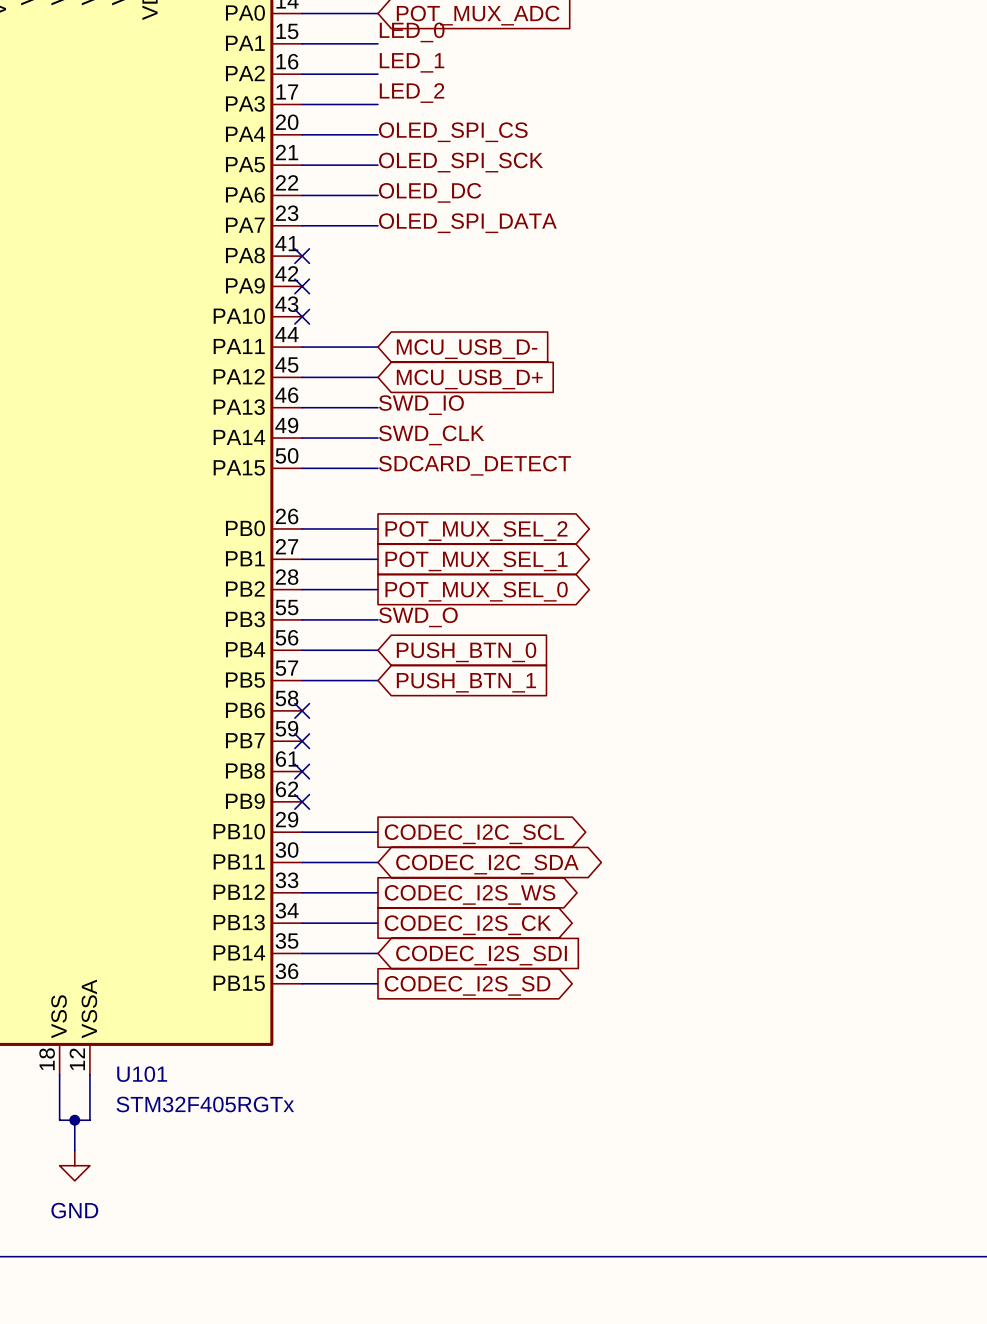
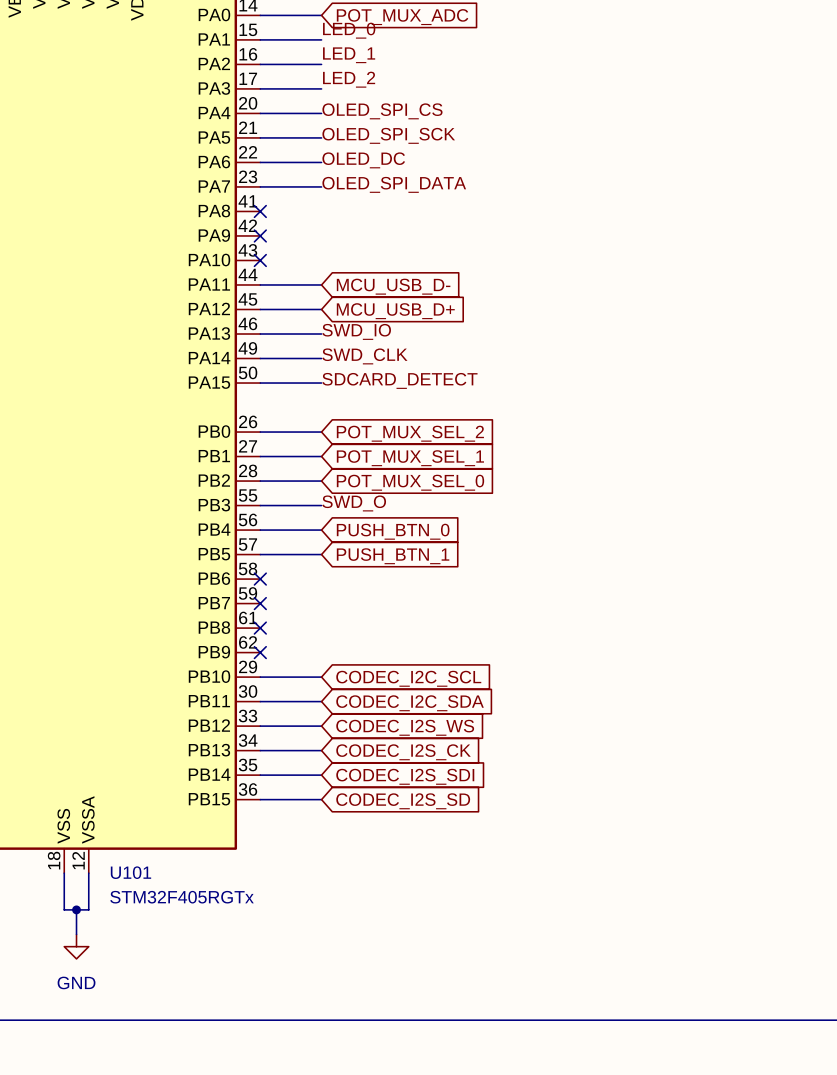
global label shape: output (476, 531) -> input (410, 433)
global label shape: output (476, 561) -> input (410, 458)
global label shape: output (476, 591) -> input (410, 482)
global label shape: output (474, 834) -> input (408, 678)
global label shape: bidirectional (487, 864) -> input (410, 703)
global label shape: output (470, 894) -> input (405, 727)
global label shape: output (467, 925) -> input (403, 752)
global label shape: output (467, 985) -> input (403, 801)

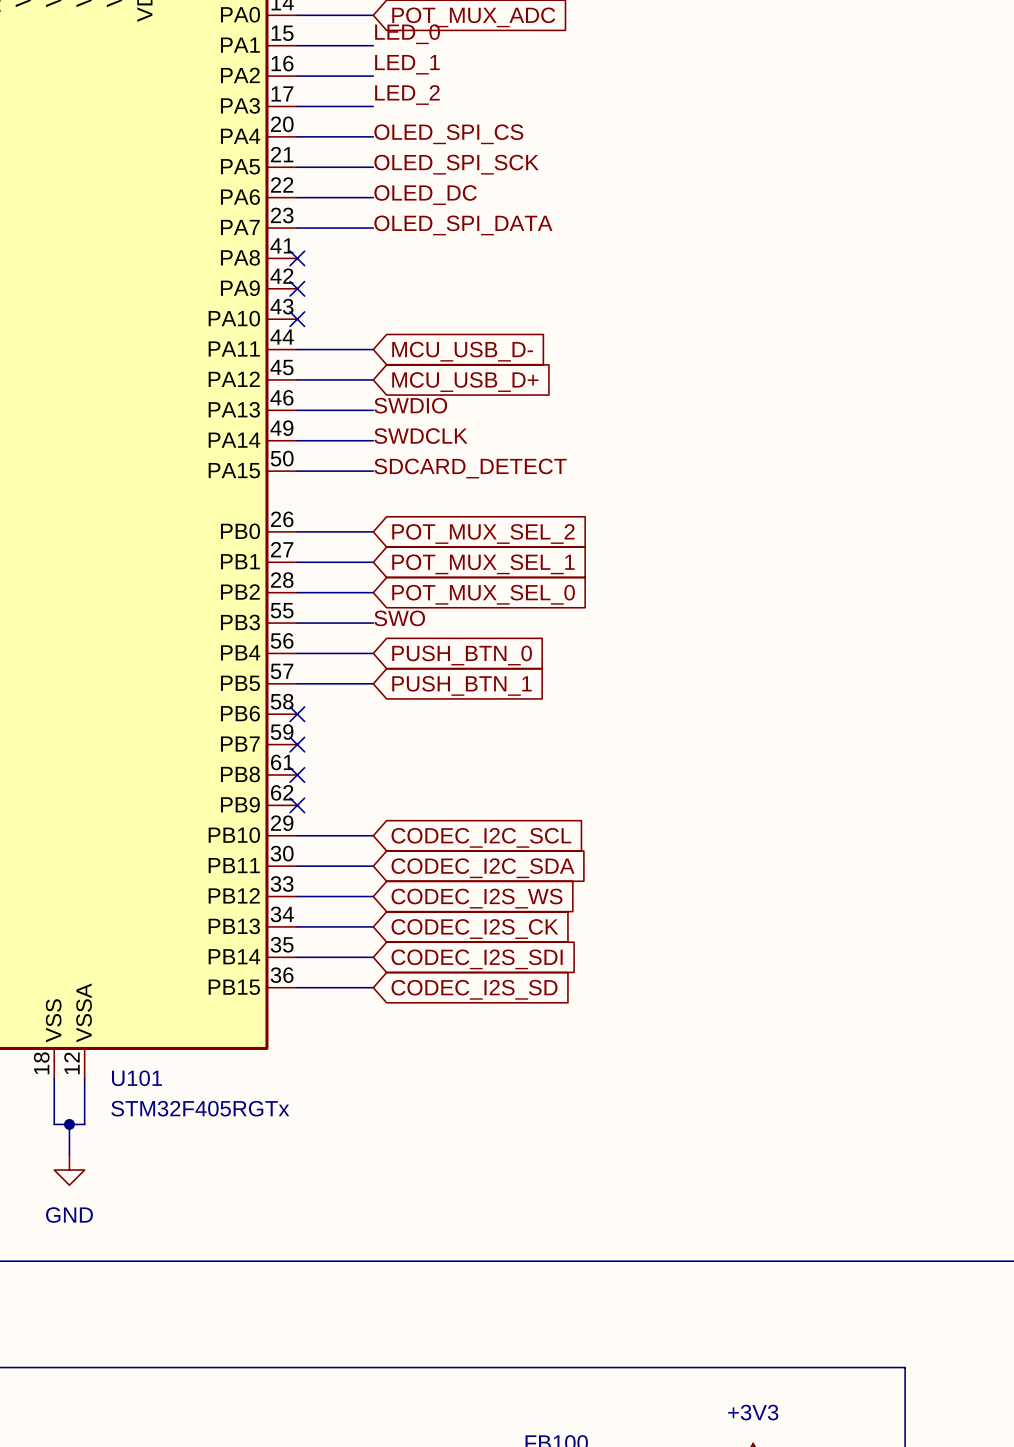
label: SWD_IO (356, 331) -> SWDIO (410, 405)
label: SWD_CLK (364, 356) -> SWDCLK (420, 436)
label: SWD_O (354, 503) -> SWO (399, 618)

